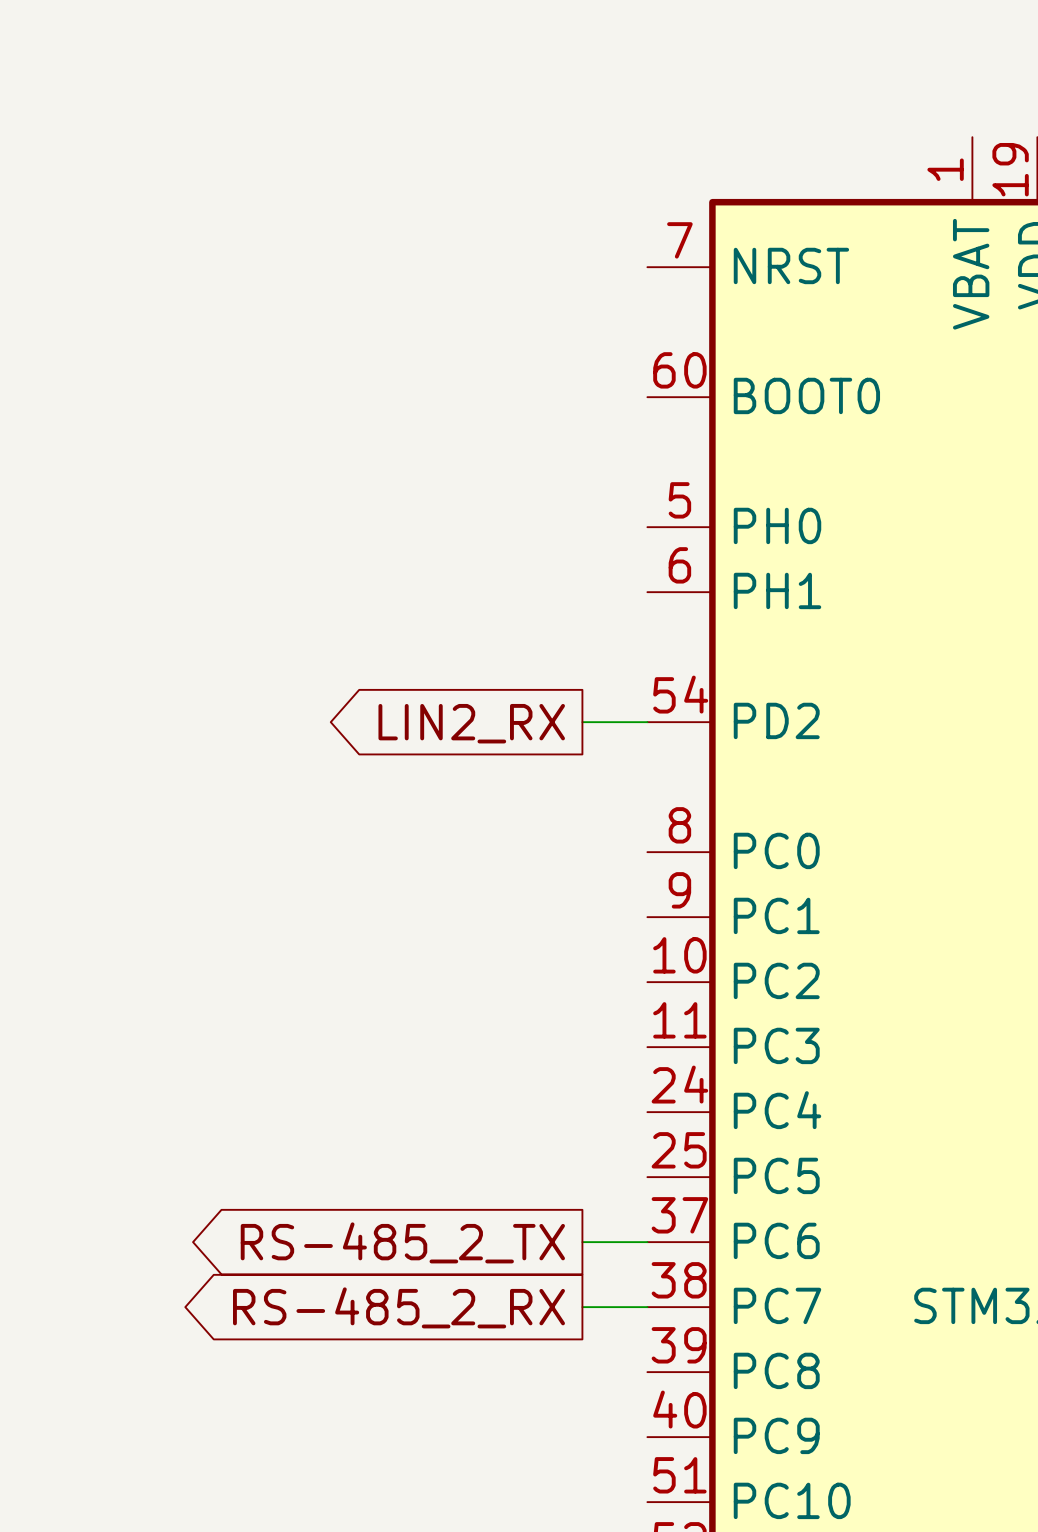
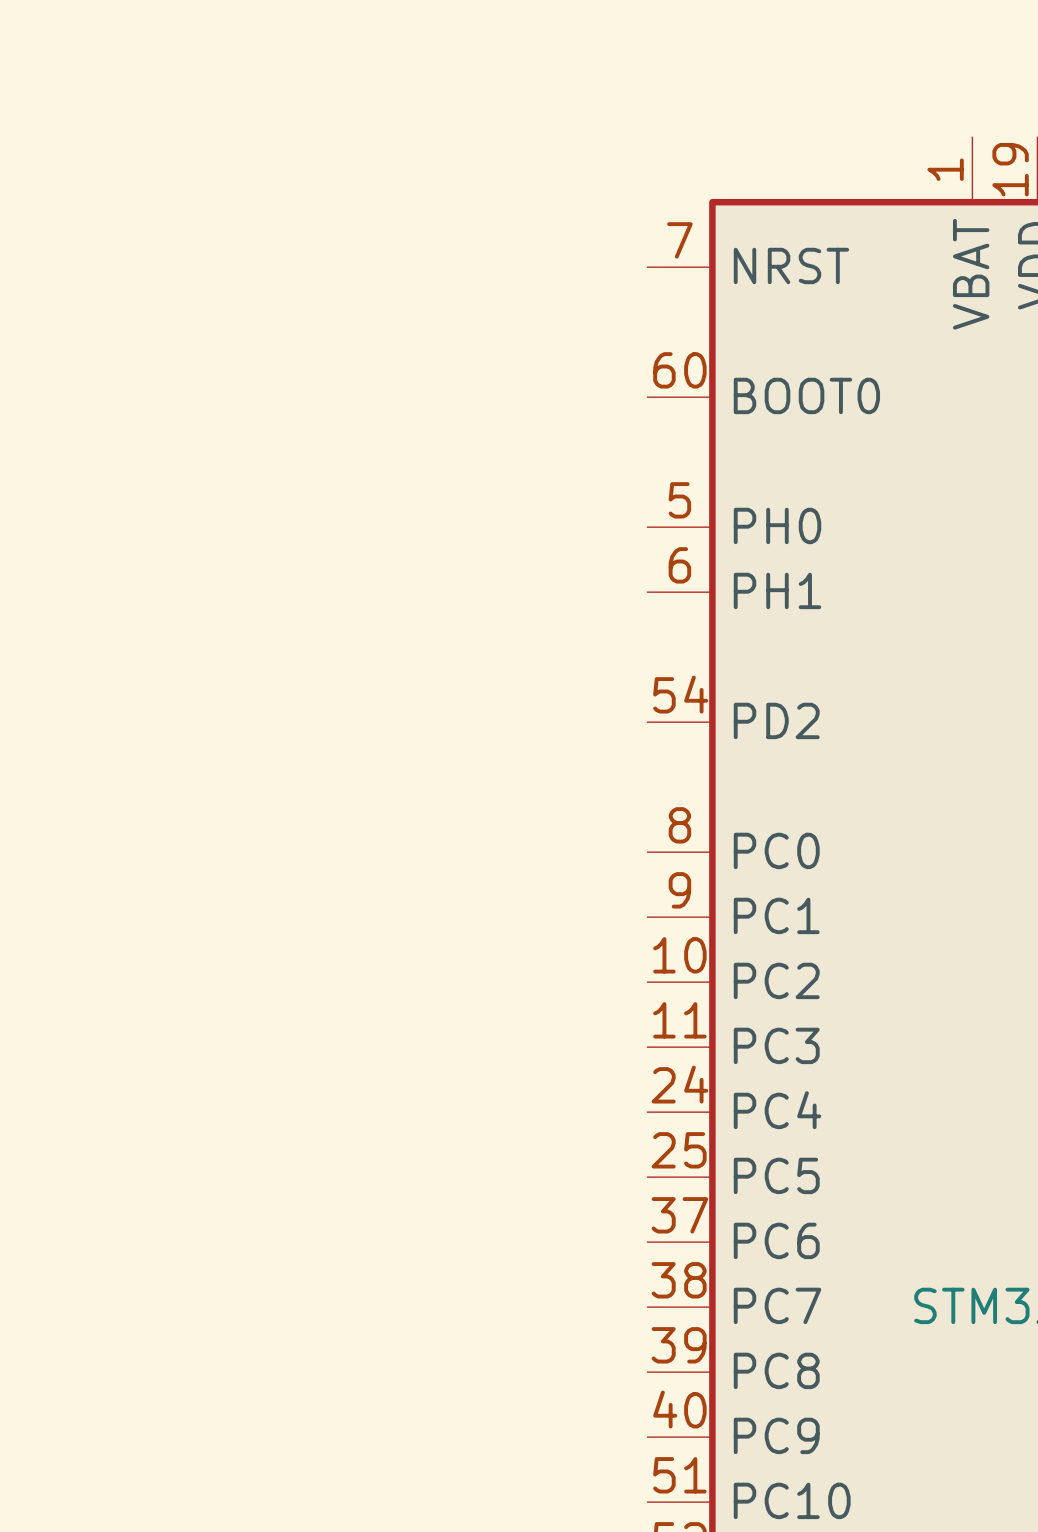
wire: (582, 722) (647, 722) -> none
global label: LIN2_RX (471, 723) -> none
global label: RS-485_2_TX (402, 1242) -> none
wire: (582, 1242) (647, 1242) -> none
global label: RS-485_2_RX (398, 1307) -> none
wire: (582, 1307) (647, 1307) -> none

